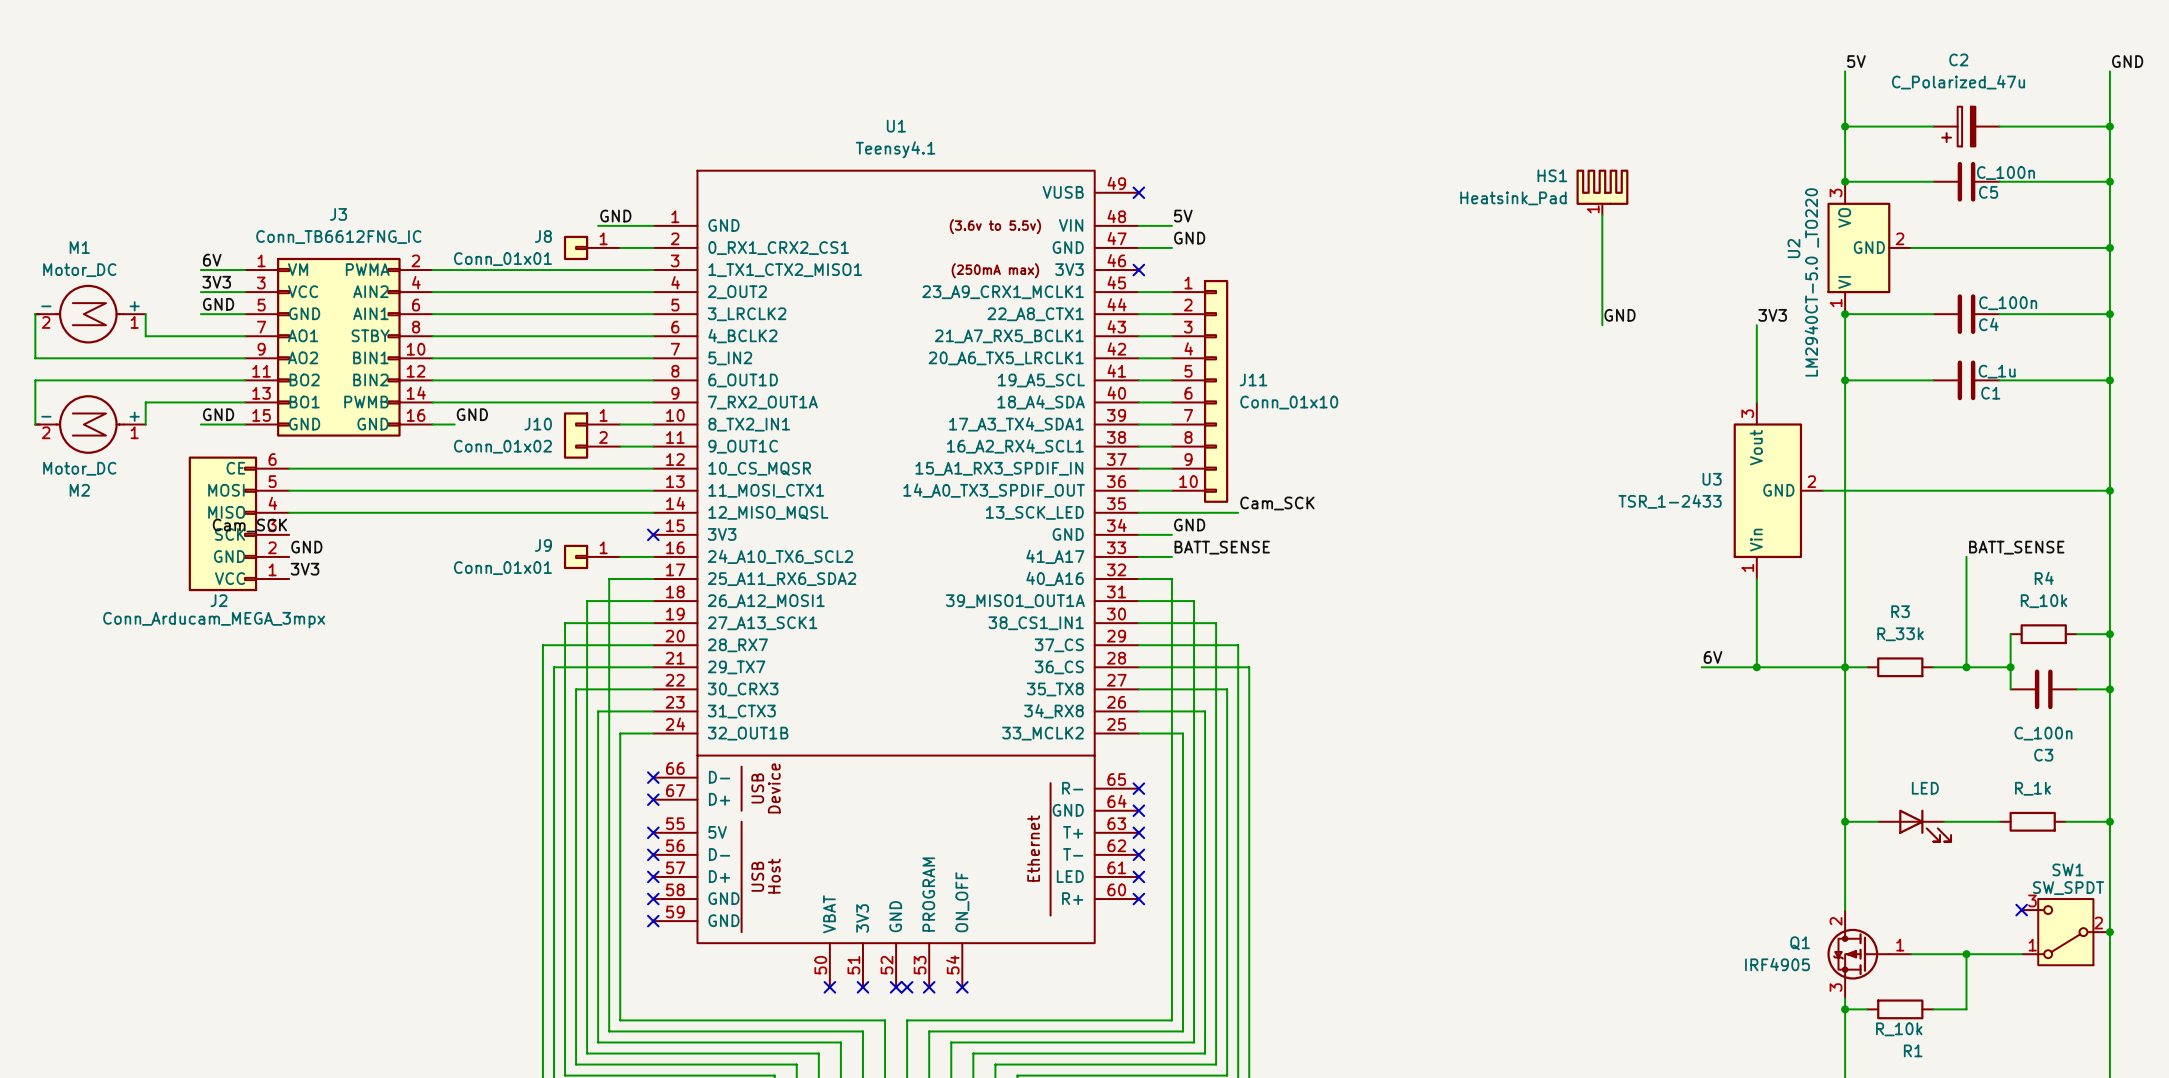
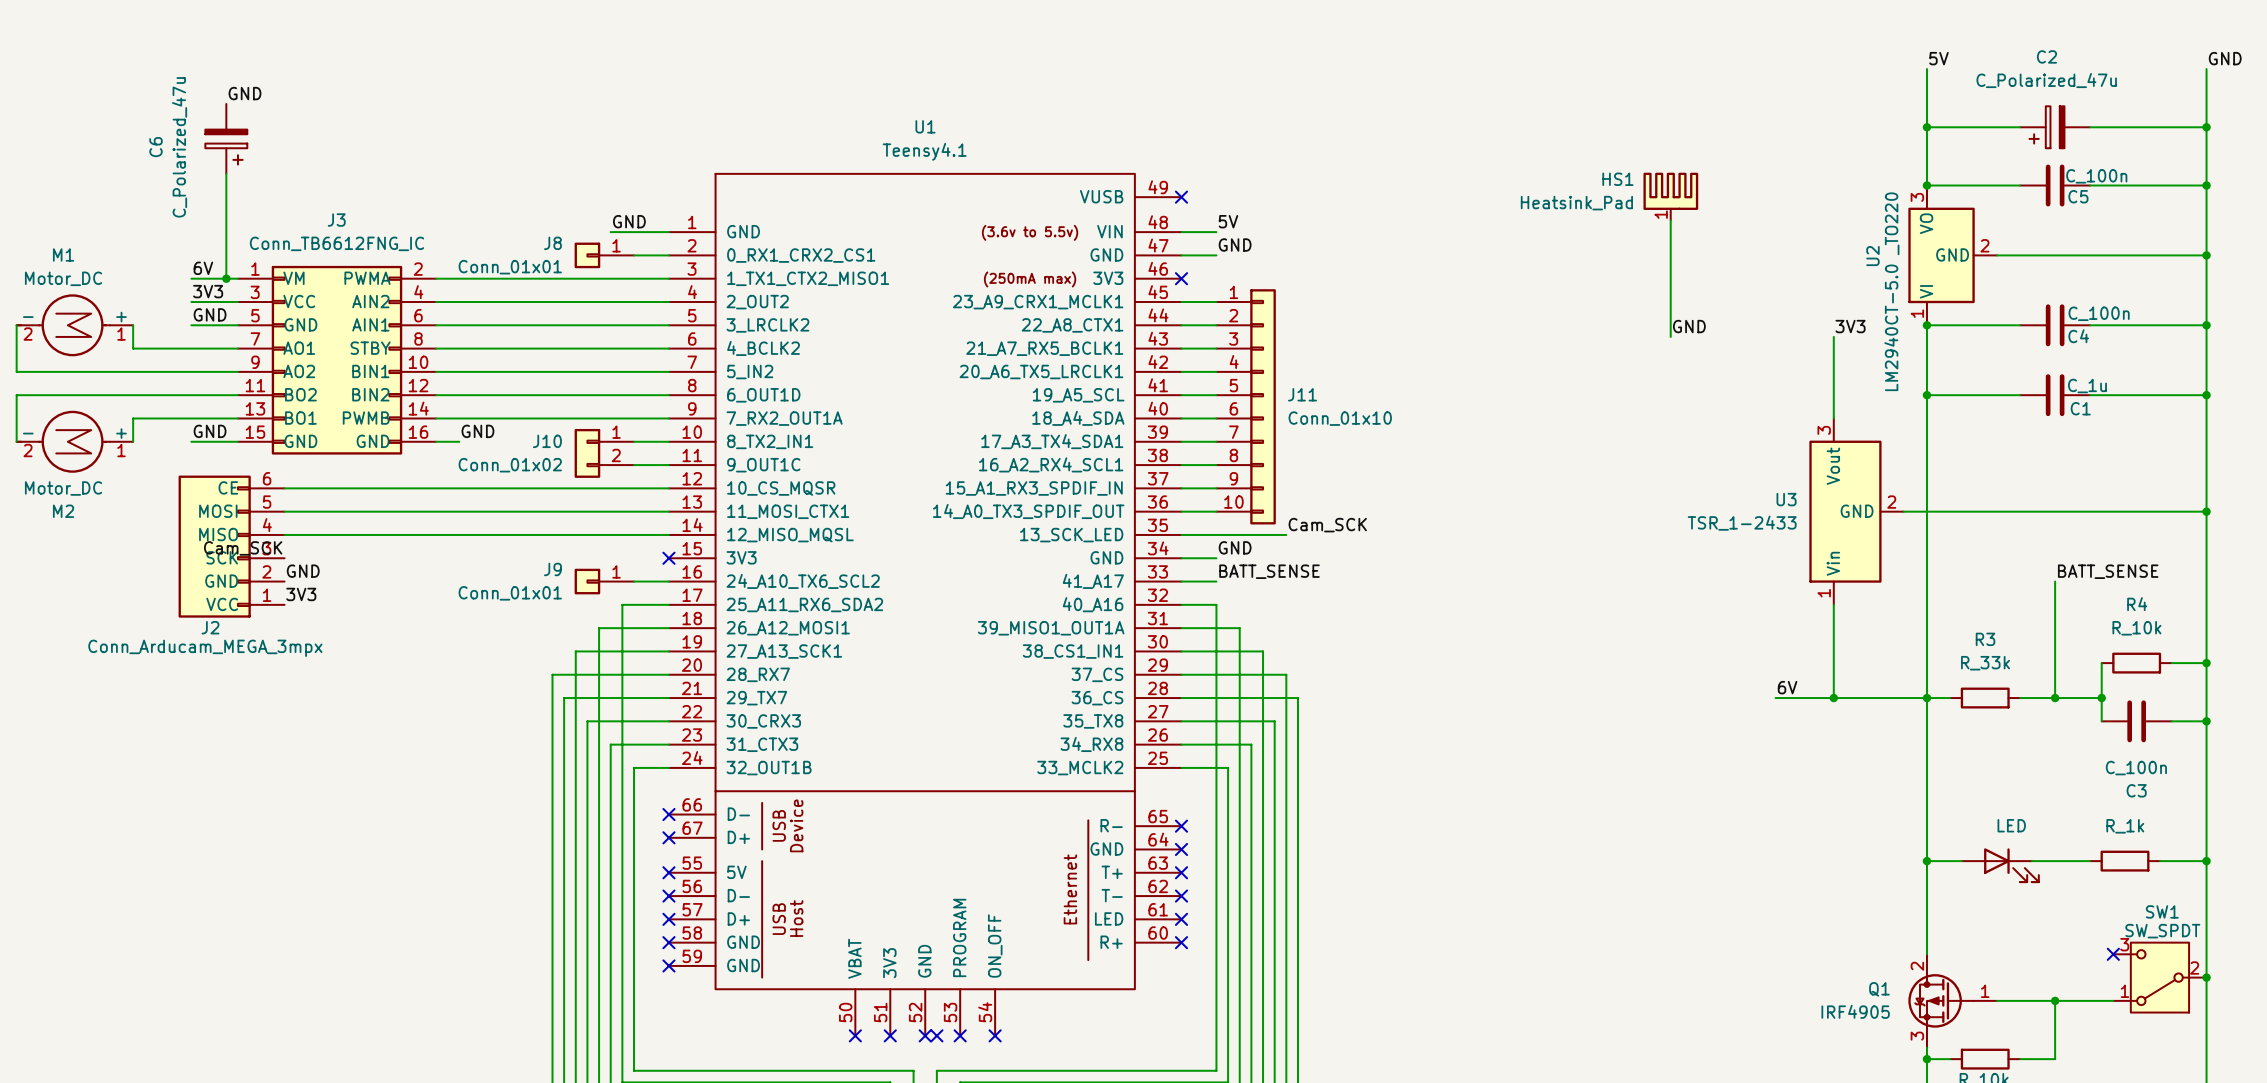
label: none -> GND (245, 93)
C6: none -> C_Polarized_47u (226, 138)
wire: none -> (226, 173) (226, 278)
junction: none -> (226, 278)

